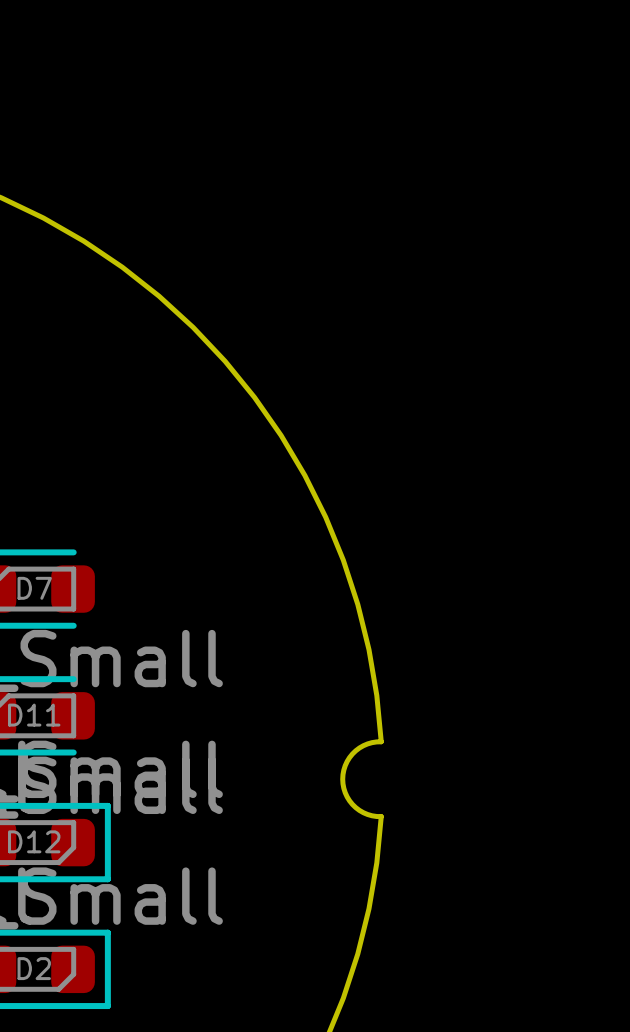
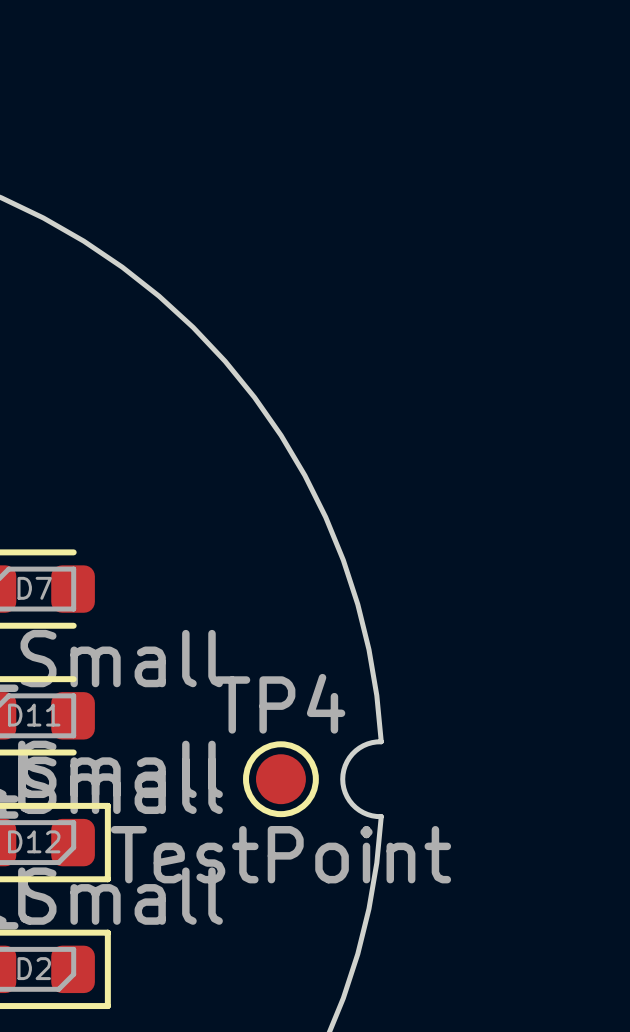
TP4: none -> TestPoint (280, 779)

